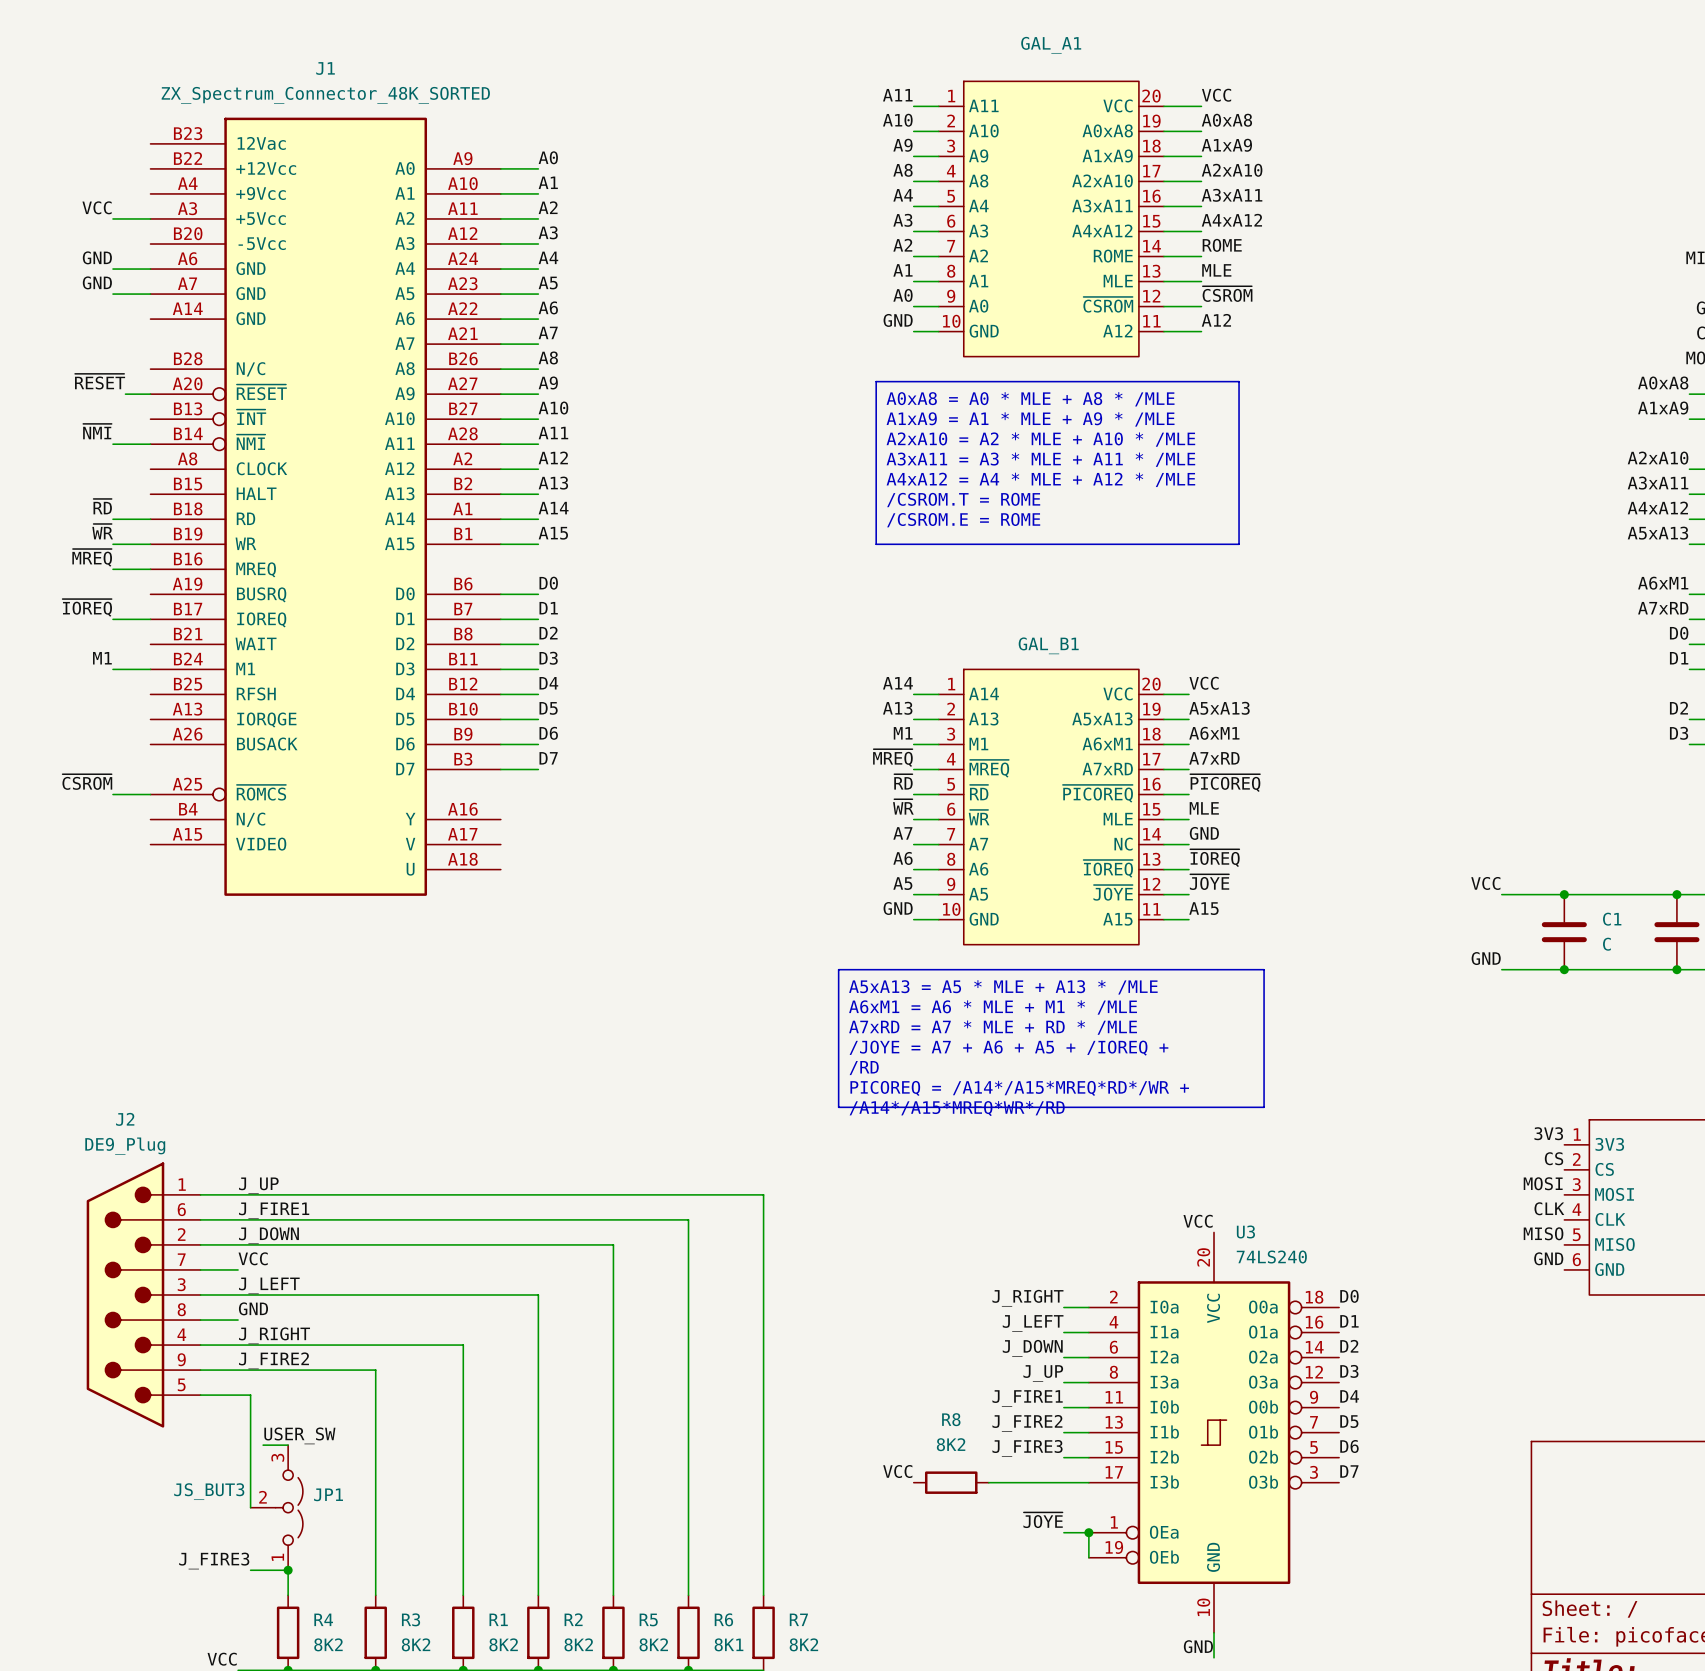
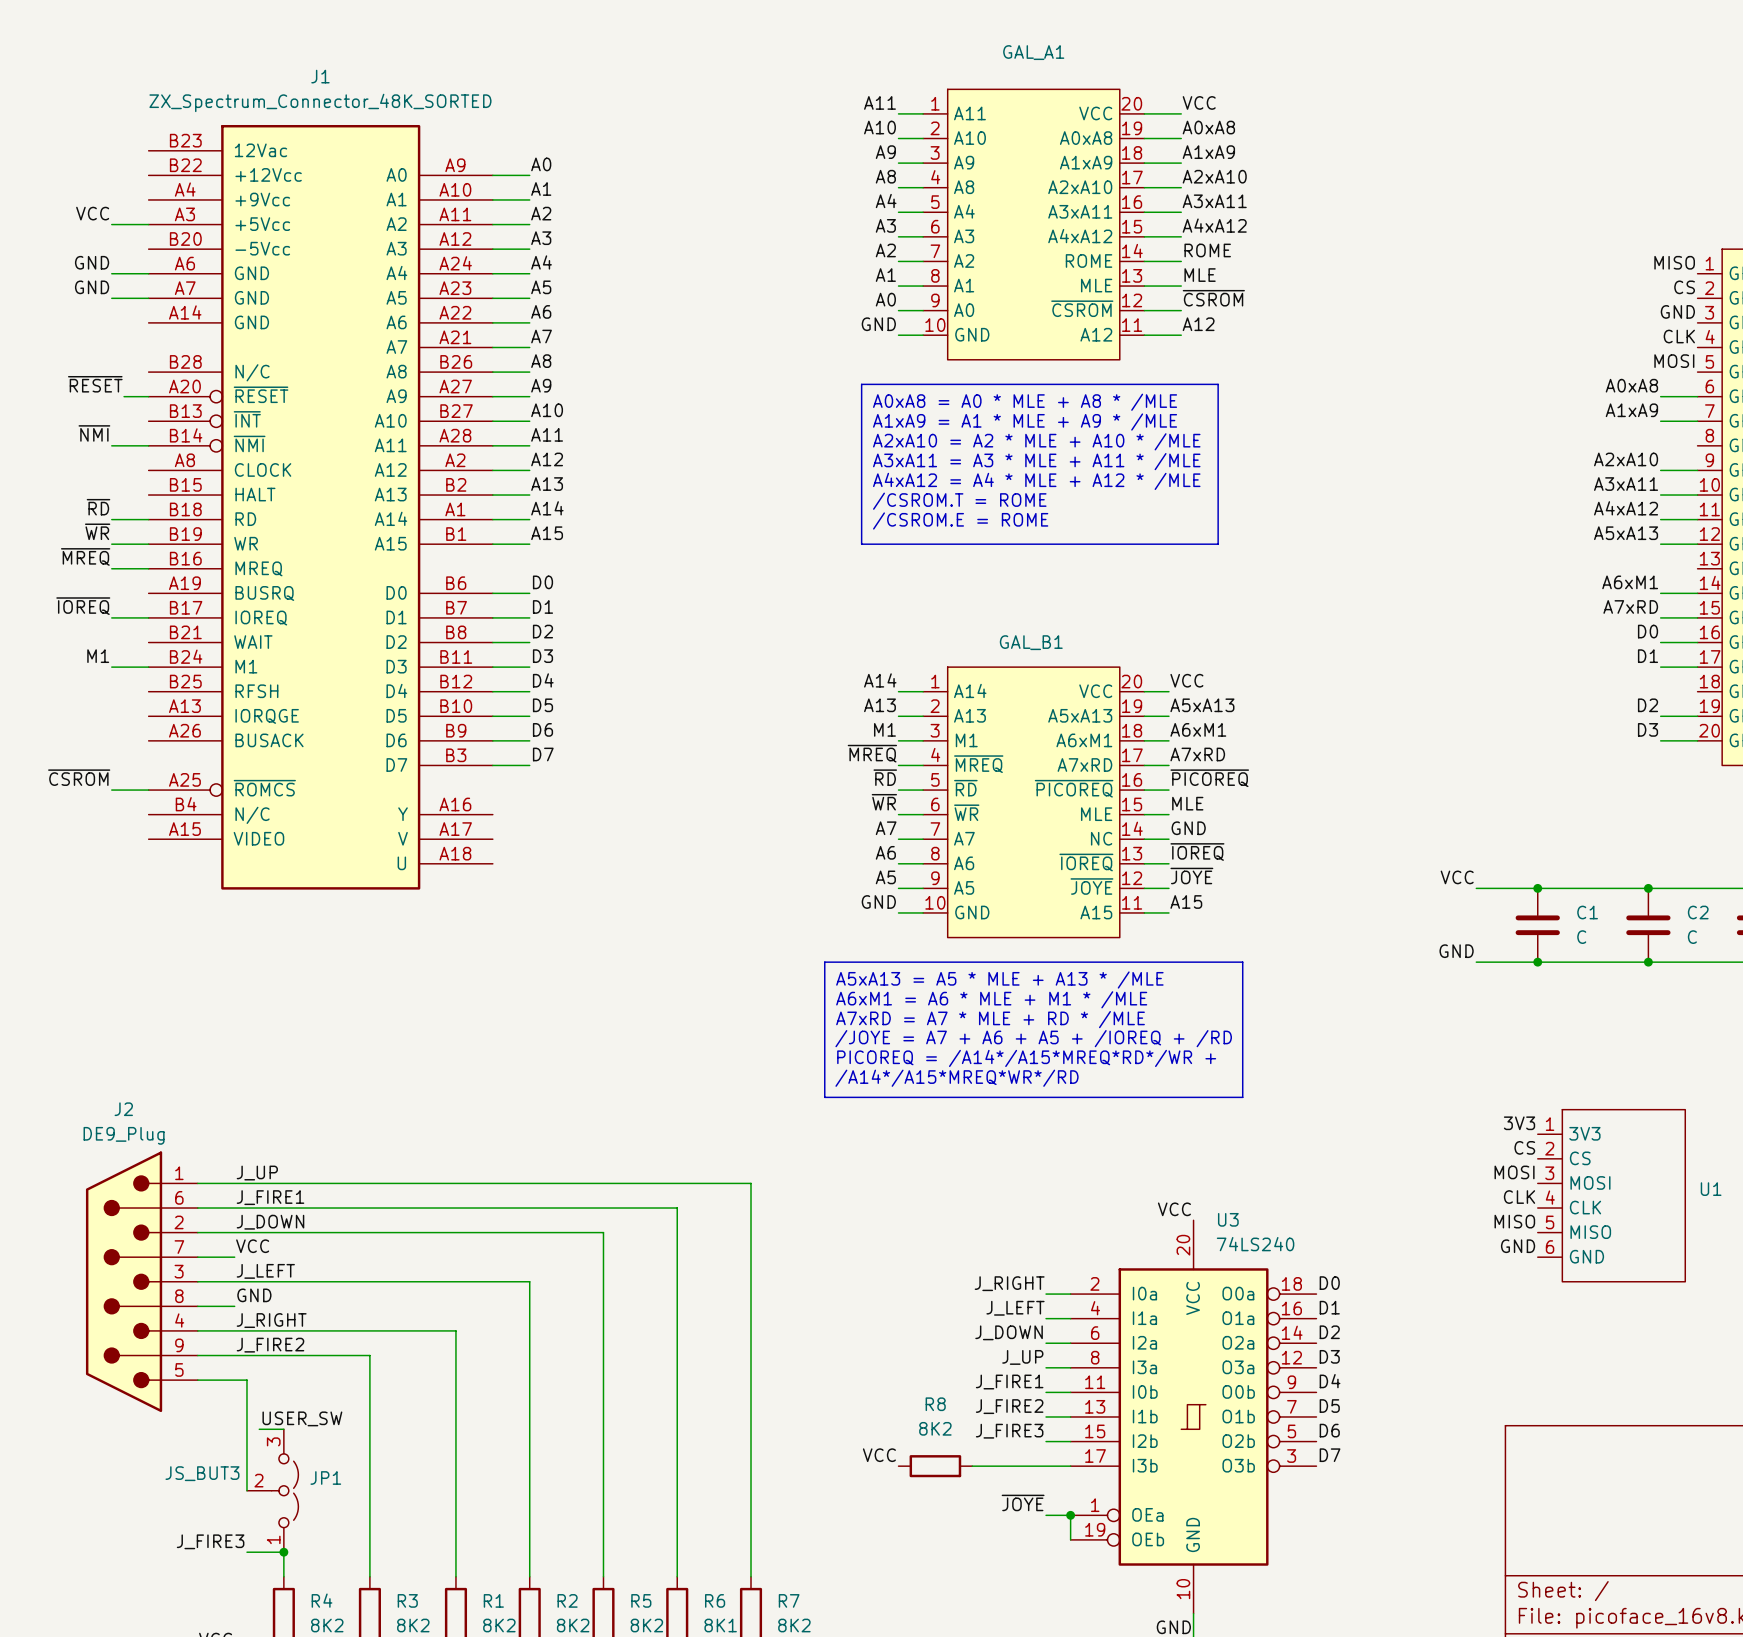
text: /JOYE = A7 + A6 + A5 + /IOREQ + (1008, 1048) -> /JOYE = A7 + A6 + A5 + /IOREQ + /RD (1033, 1038)
text: /RD (864, 1068) -> PICOREQ = /A14*/A15*MREQ*RD*/WR + (1026, 1058)
text: PICOREQ = /A14*/A15*MREQ*RD*/WR + (1019, 1088) -> /A14*/A15*MREQ*WR*/RD (957, 1078)
text: /A14*/A15*MREQ*WR*/RD (957, 1108) -> none

